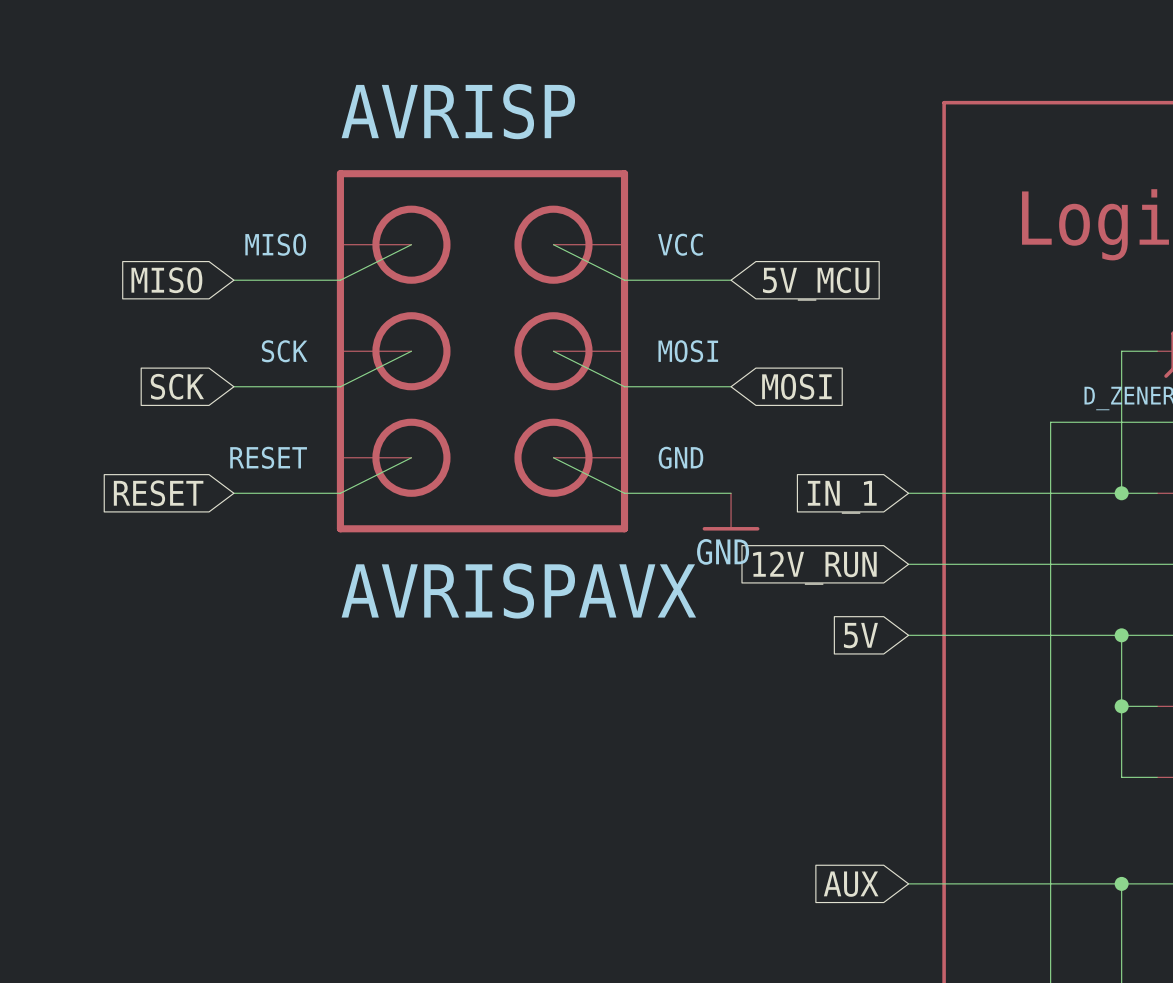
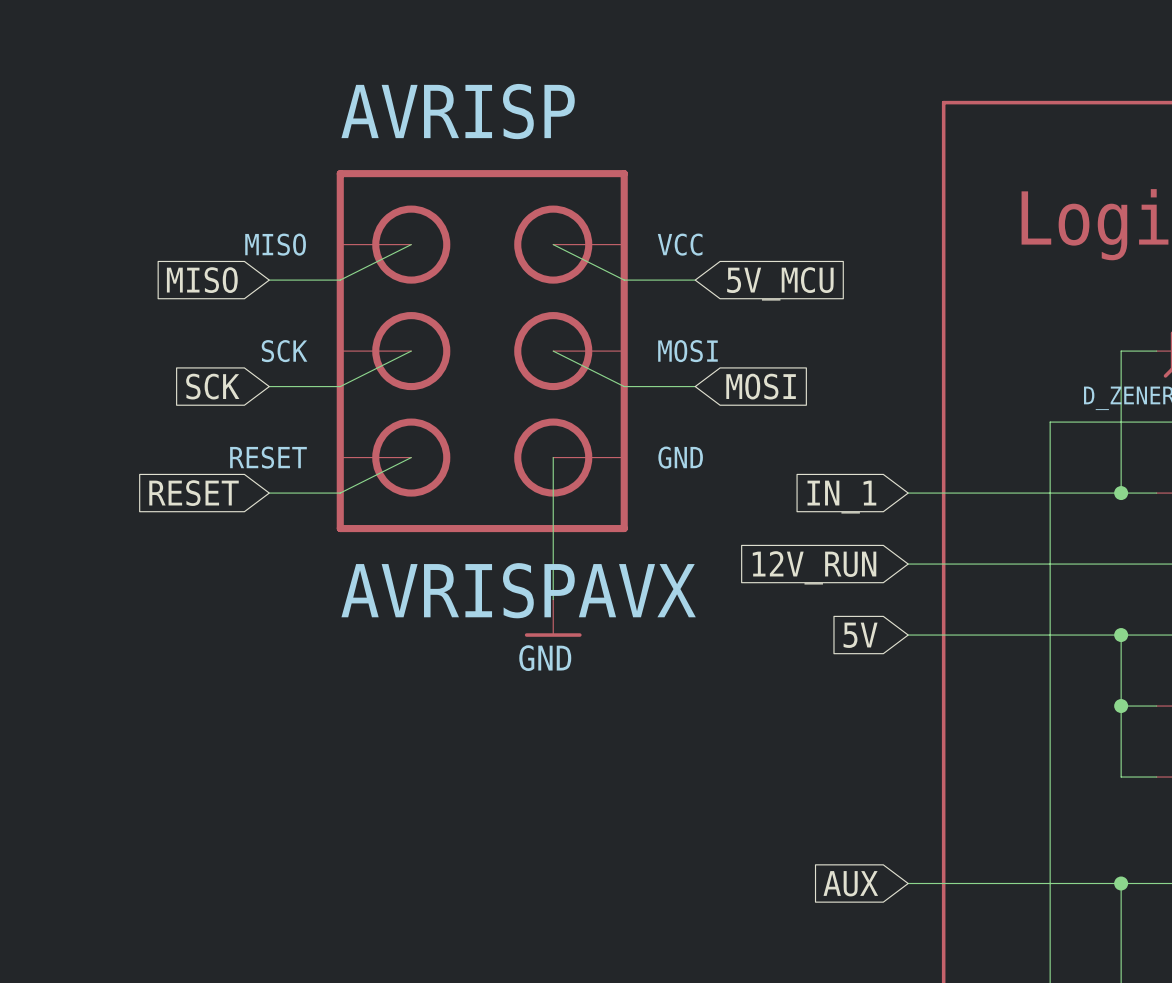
global label position: MISO (166, 280) -> MISO (202, 280)
wire: (233, 280) (269, 280) -> none
wire: (695, 280) (731, 280) -> none
global label position: 5V_MCU (816, 284) -> 5V_MCU (780, 283)
global label position: SCK (177, 386) -> SCK (212, 386)
wire: (233, 386) (269, 386) -> none
wire: (695, 386) (731, 386) -> none
global label position: MOSI (796, 386) -> MOSI (761, 386)
wire: (553, 457) (624, 493) (731, 493) -> (553, 457) (553, 599)
global label position: RESET (158, 493) -> RESET (194, 493)
wire: (233, 493) (269, 493) -> none
power symbol position: GND (731, 511) -> GND (553, 618)

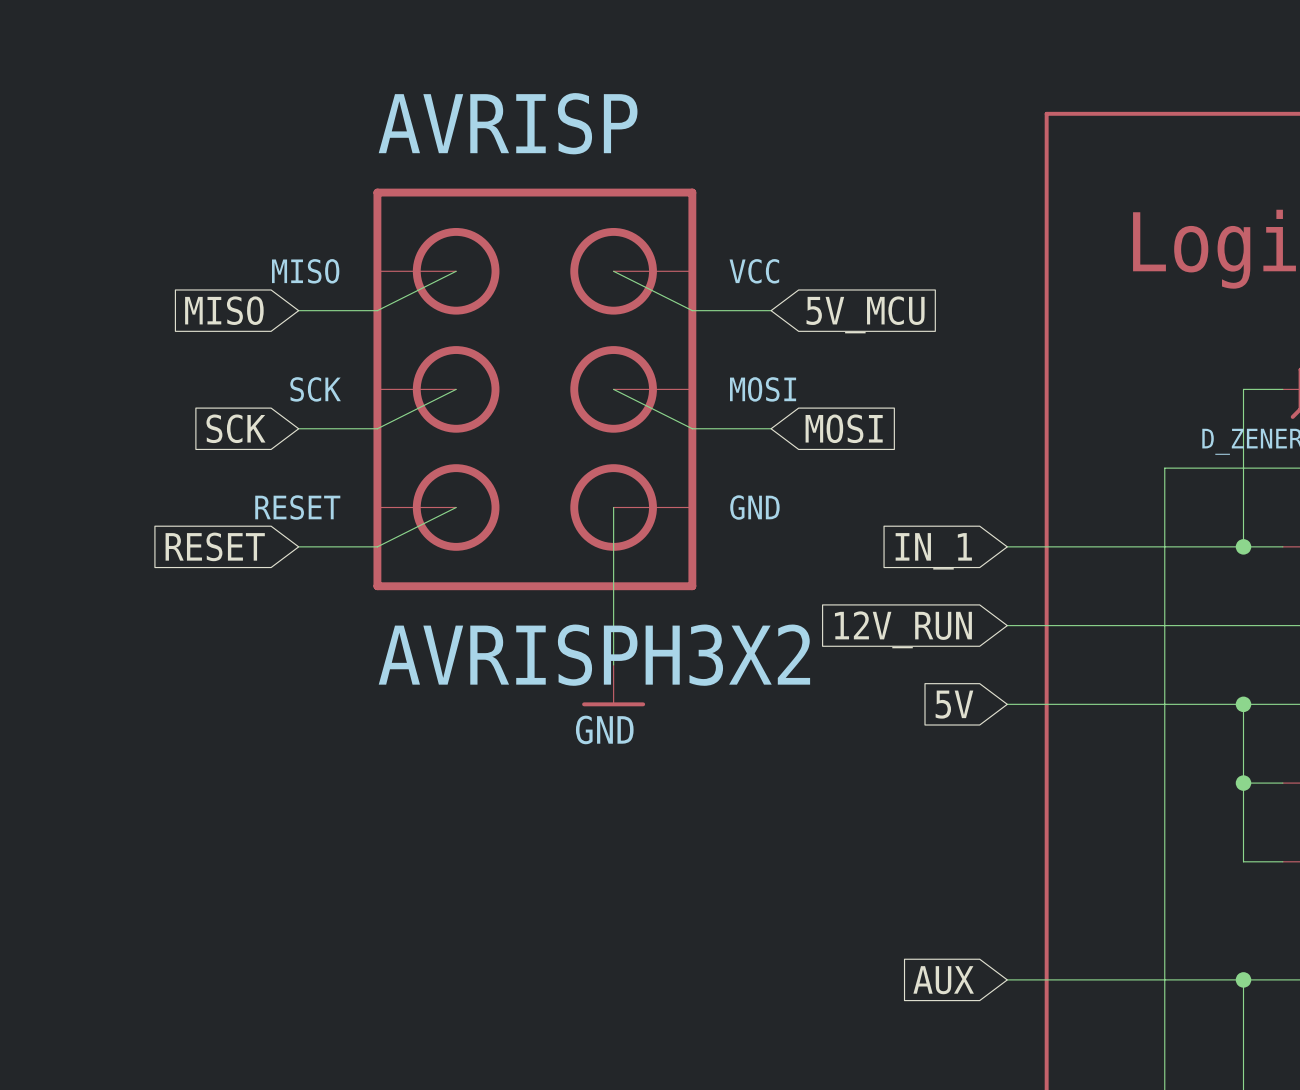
AVRISP value: AVRISPAVX (518, 590) -> AVRISPH3X2 (594, 655)

